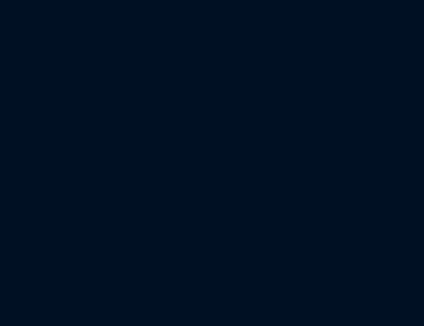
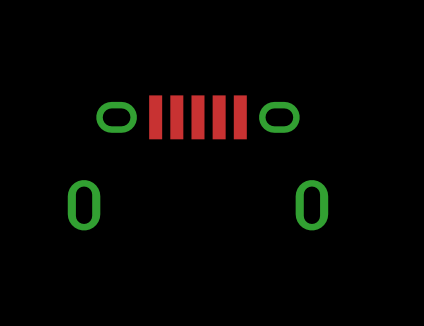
part: none -> (197, 162)

